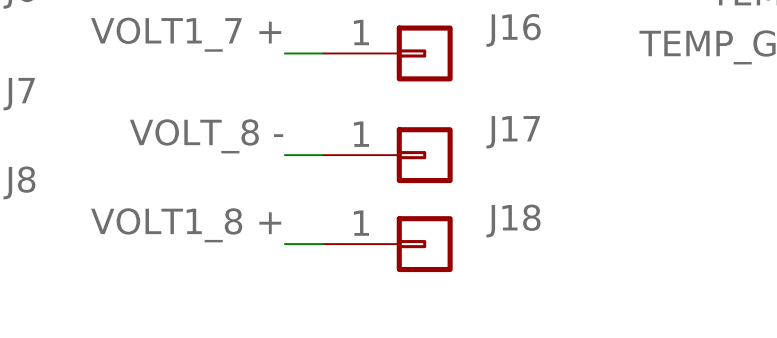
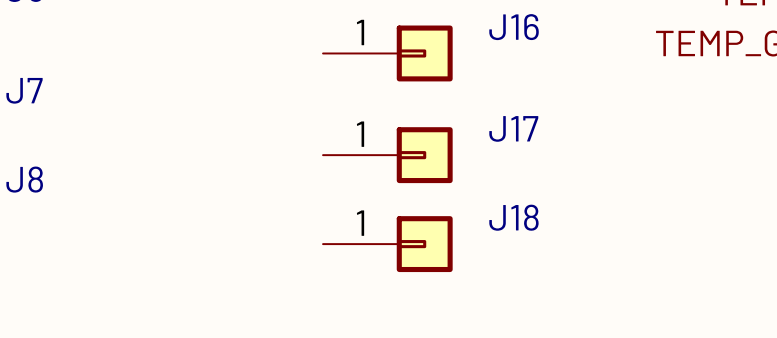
label: VOLT1_7 + (186, 34) -> none
wire: (284, 53) (323, 53) -> none
label: VOLT_8 - (206, 136) -> none
wire: (284, 155) (323, 155) -> none
label: VOLT1_8 + (186, 225) -> none
wire: (284, 244) (323, 244) -> none

